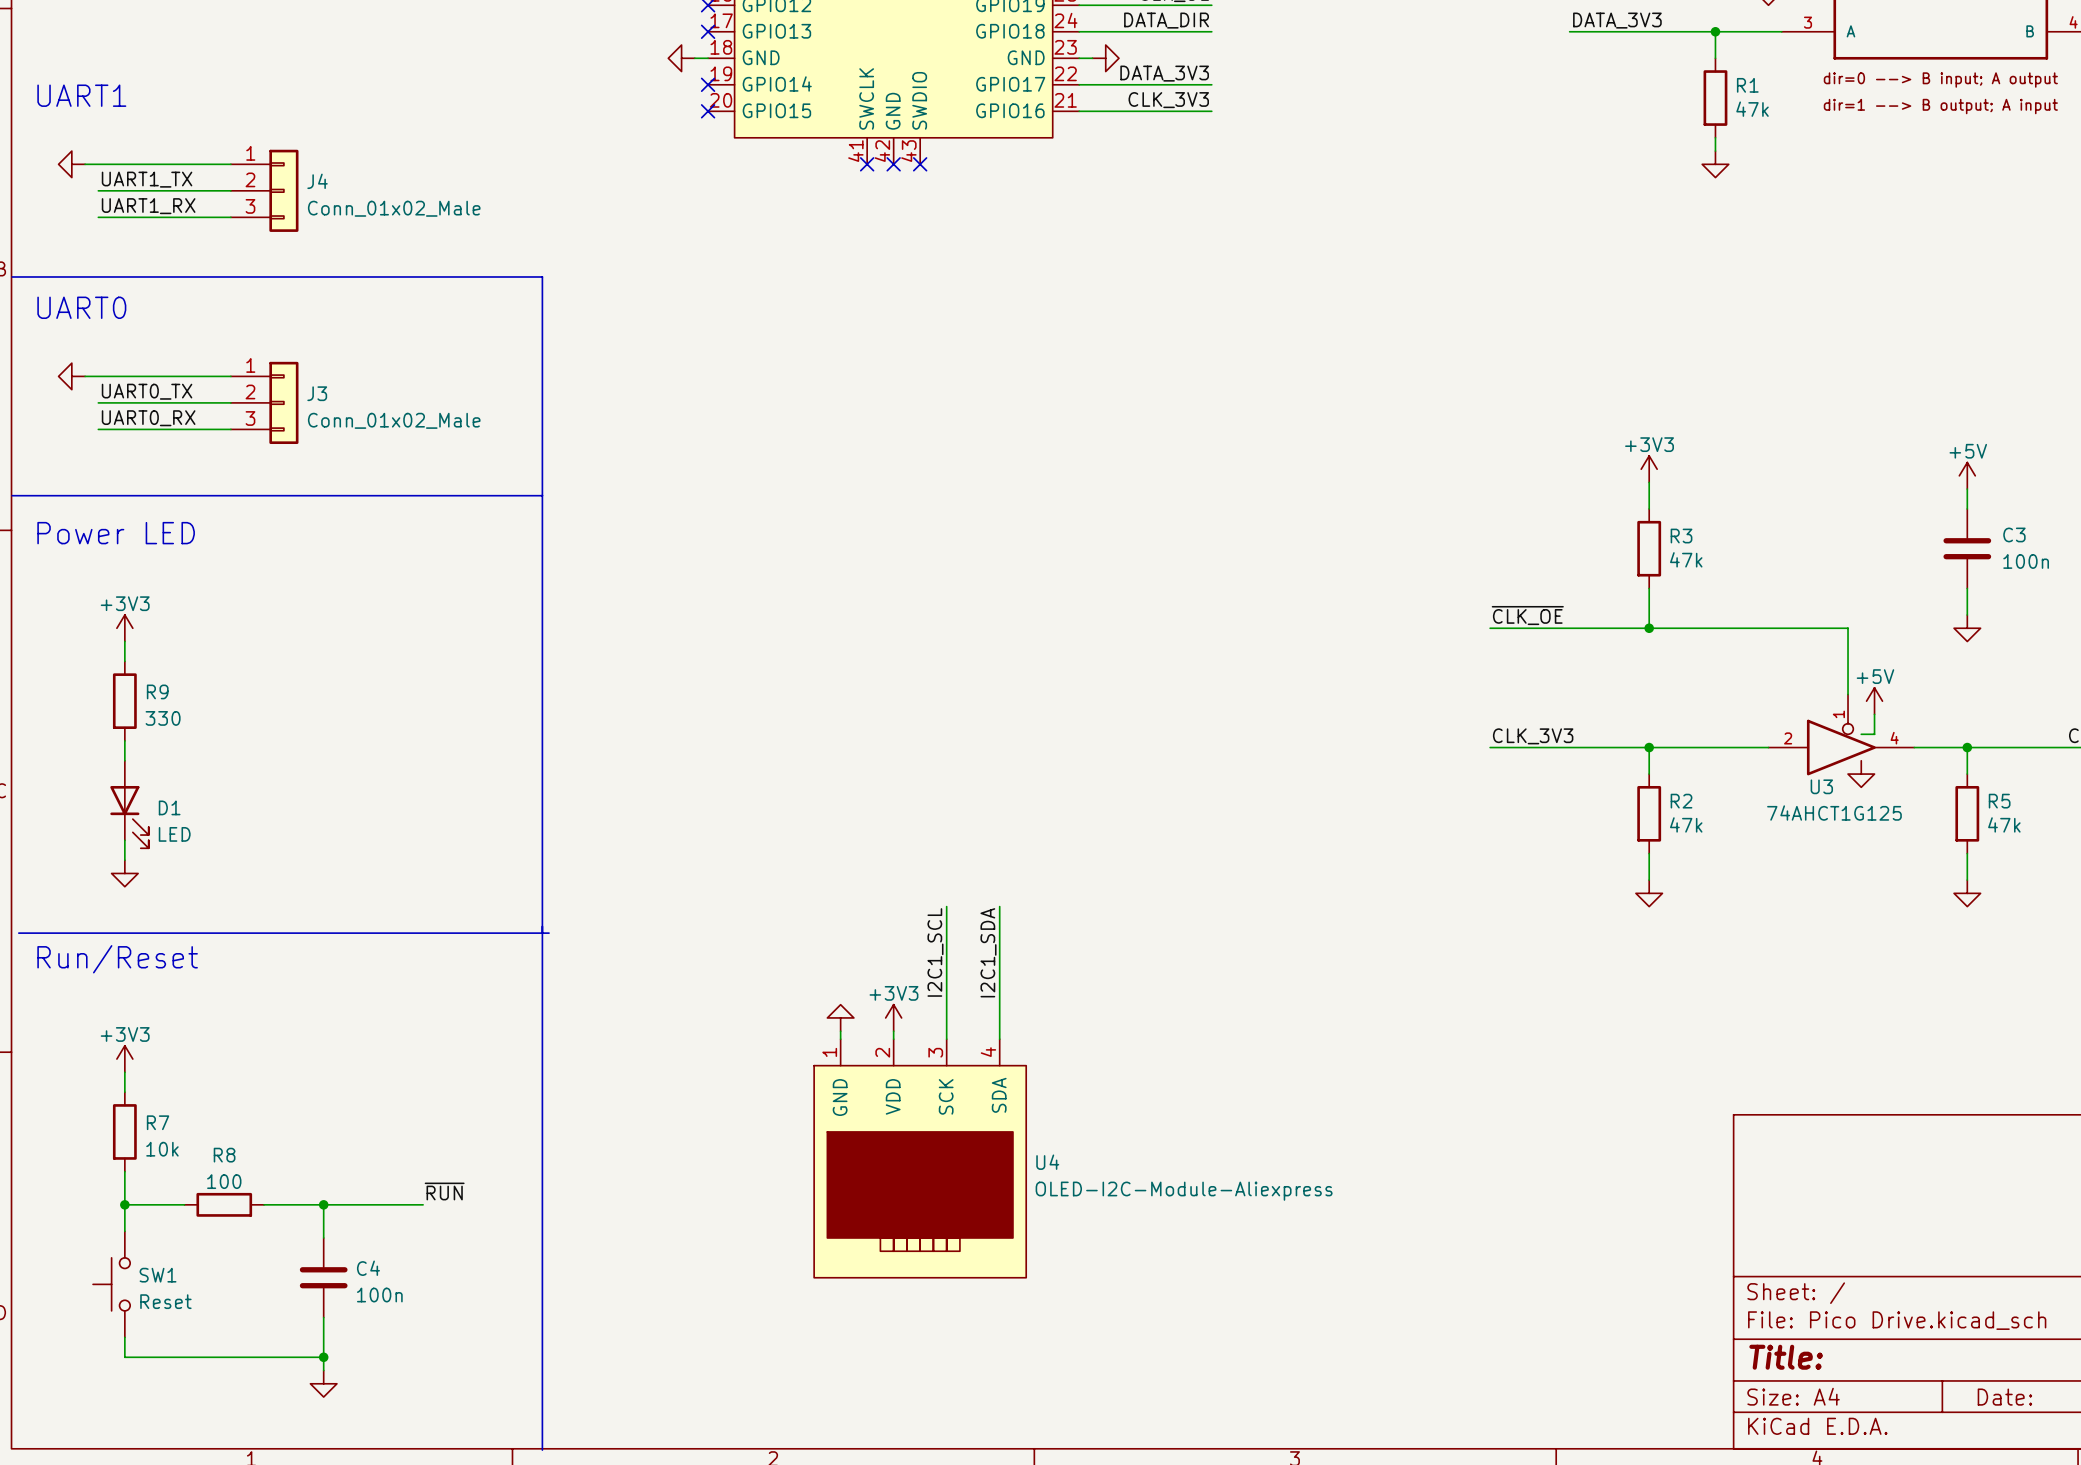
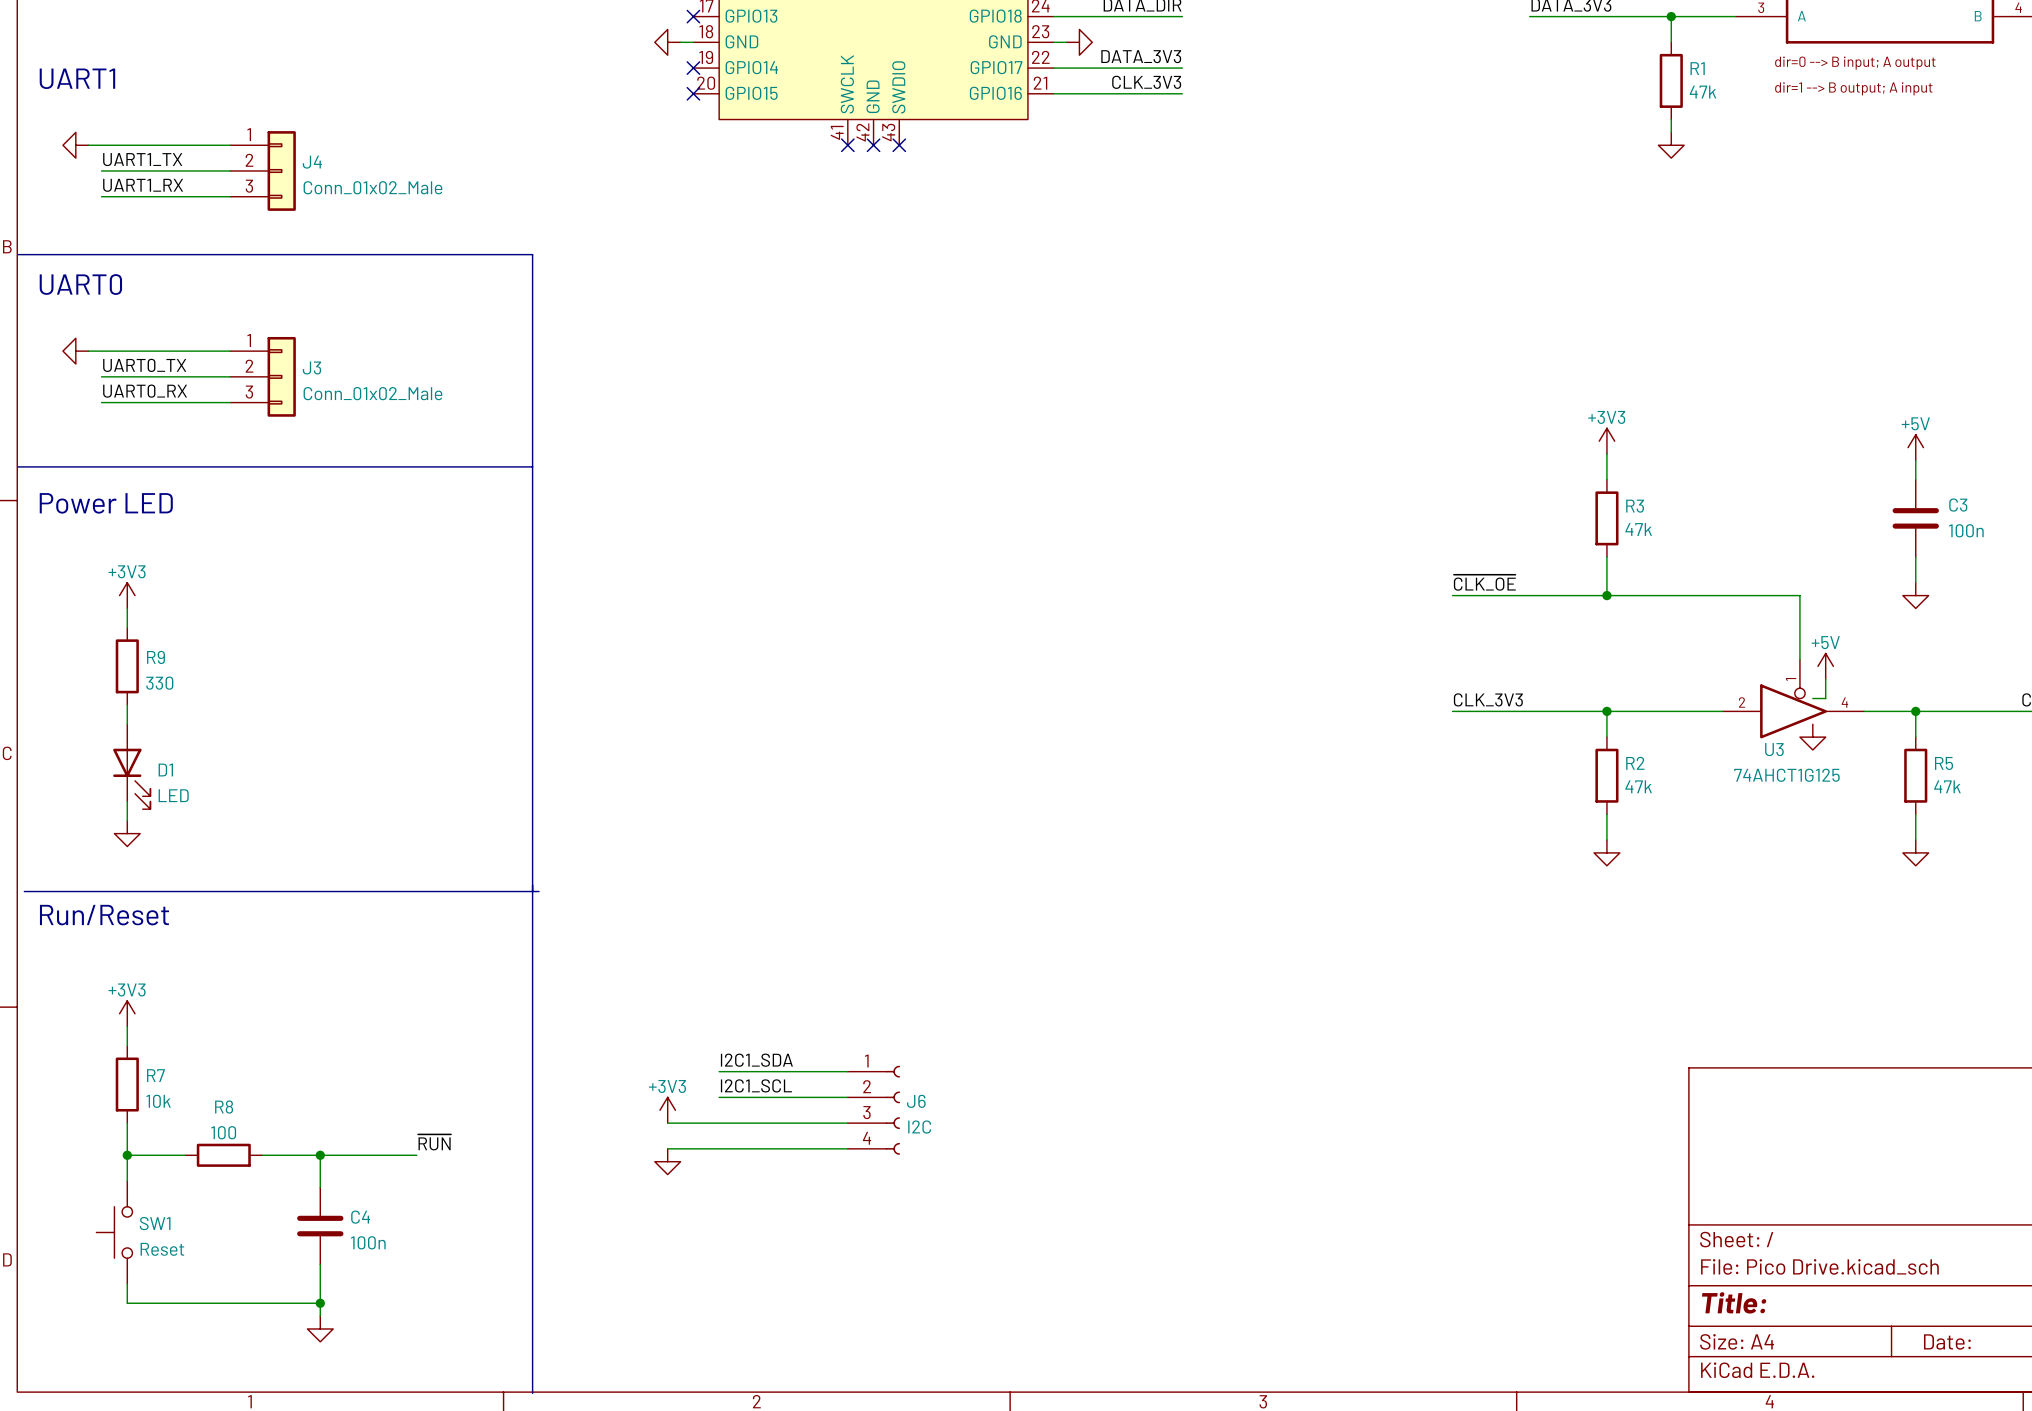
wire: (946, 906) (946, 1039) -> none
wire: (999, 906) (999, 1039) -> none
label: I2C1_SCL (935, 952) -> none
label: I2C1_SDA (988, 952) -> none
power symbol rotation: 0° (840, 1017) -> 180° (667, 1161)
power symbol position: (840, 1017) -> (667, 1161)
power symbol position: +3V3 (893, 1017) -> +3V3 (667, 1110)
wire: (840, 1031) (840, 1039) -> none
wire: (893, 1031) (893, 1039) -> none
label: none -> I2C1_SDA (756, 1060)
wire: none -> (719, 1071) (847, 1071)
label: none -> I2C1_SCL (756, 1085)
wire: none -> (719, 1097) (847, 1097)
J6: none -> I2C (873, 1110)
U4: OLED-I2C-Module-Aliexpress (920, 1158) -> none
wire: none -> (667, 1123) (847, 1123)
wire: none -> (667, 1148) (847, 1148)

